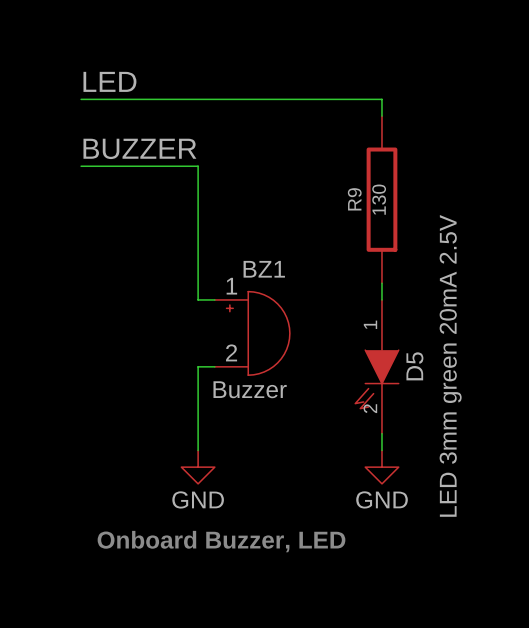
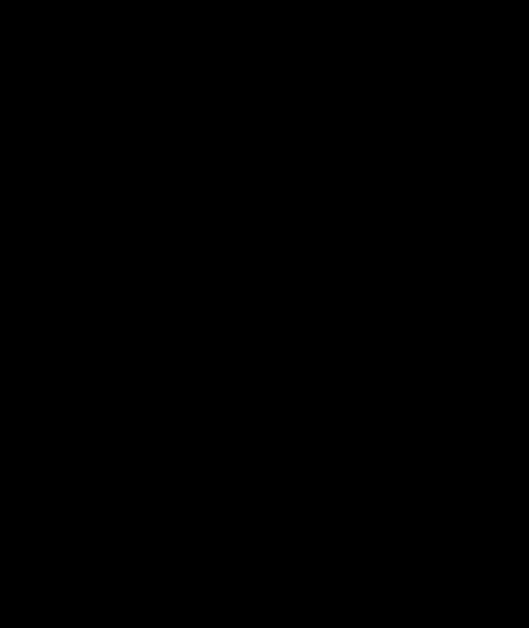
label: LED (109, 81) -> none
wire: (81, 99) (381, 99) (381, 116) -> none
label: BUZZER (139, 148) -> none
wire: (81, 166) (198, 166) (198, 299) (214, 299) -> none
R9: 130 (381, 199) -> none
wire: (381, 283) (381, 299) -> none
BZ1: Buzzer (252, 333) -> none
wire: (214, 366) (198, 366) (198, 450) -> none
D5: LED 3mm green 20mA 2.5V (376, 366) -> none
wire: (381, 433) (381, 450) -> none
power symbol: GND (198, 467) -> none
power symbol: GND (381, 467) -> none
text: Onboard Buzzer, LED (221, 541) -> none

